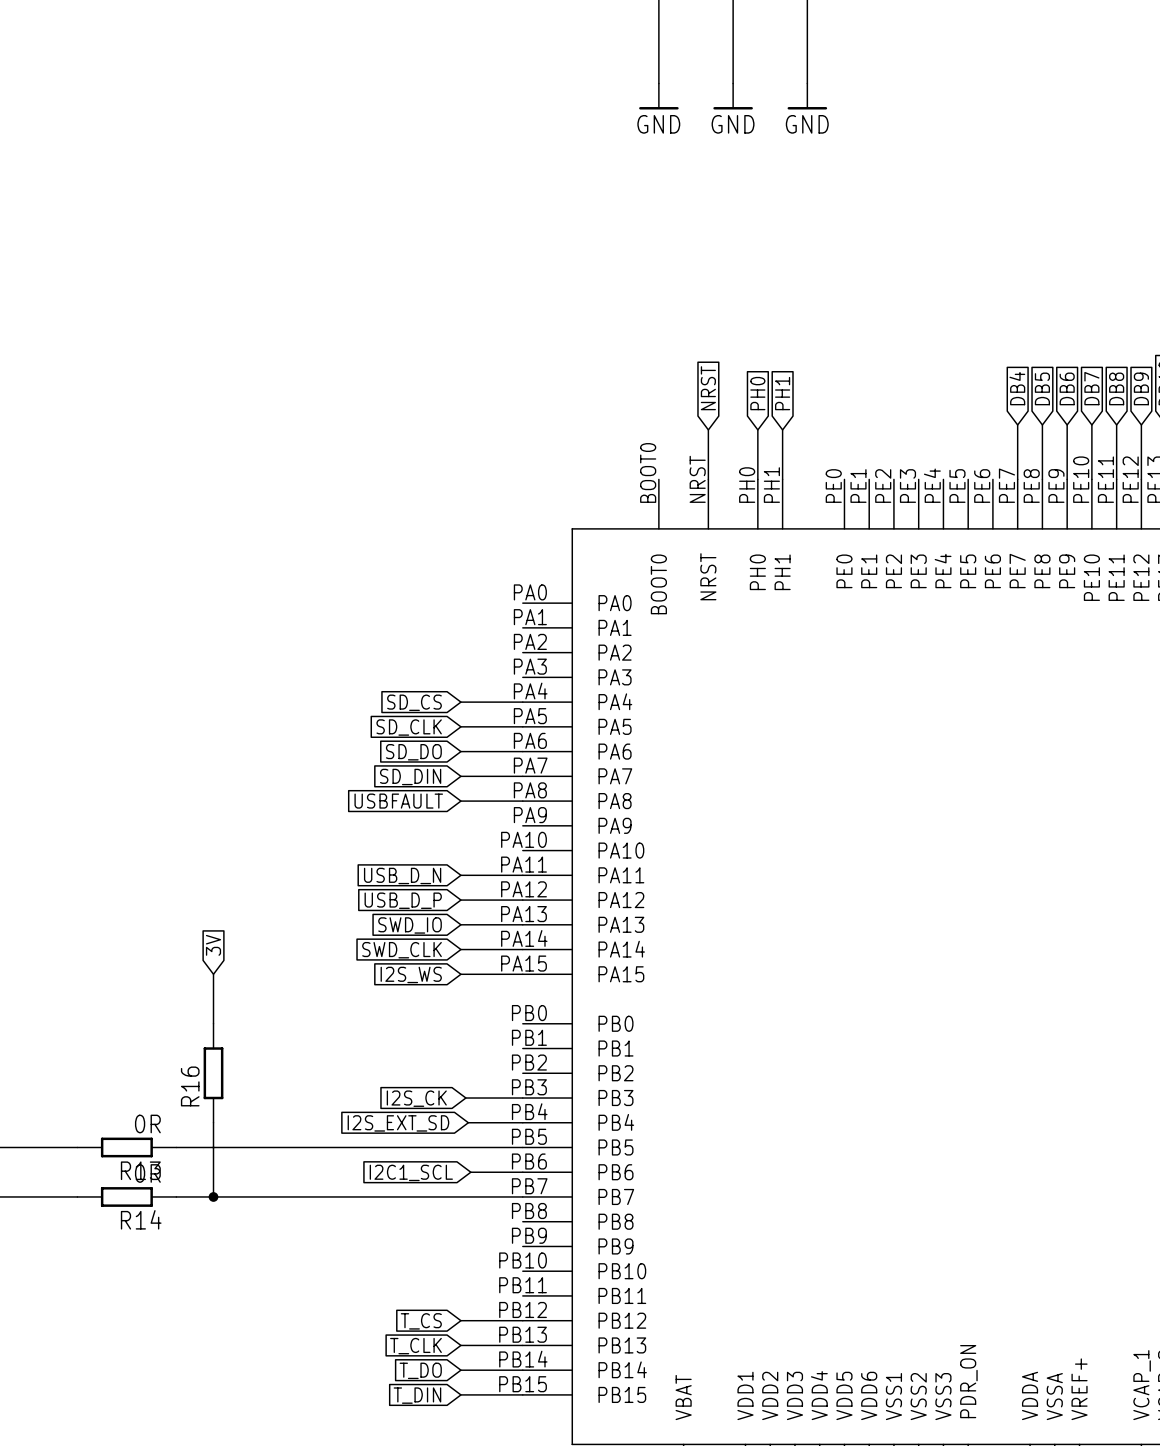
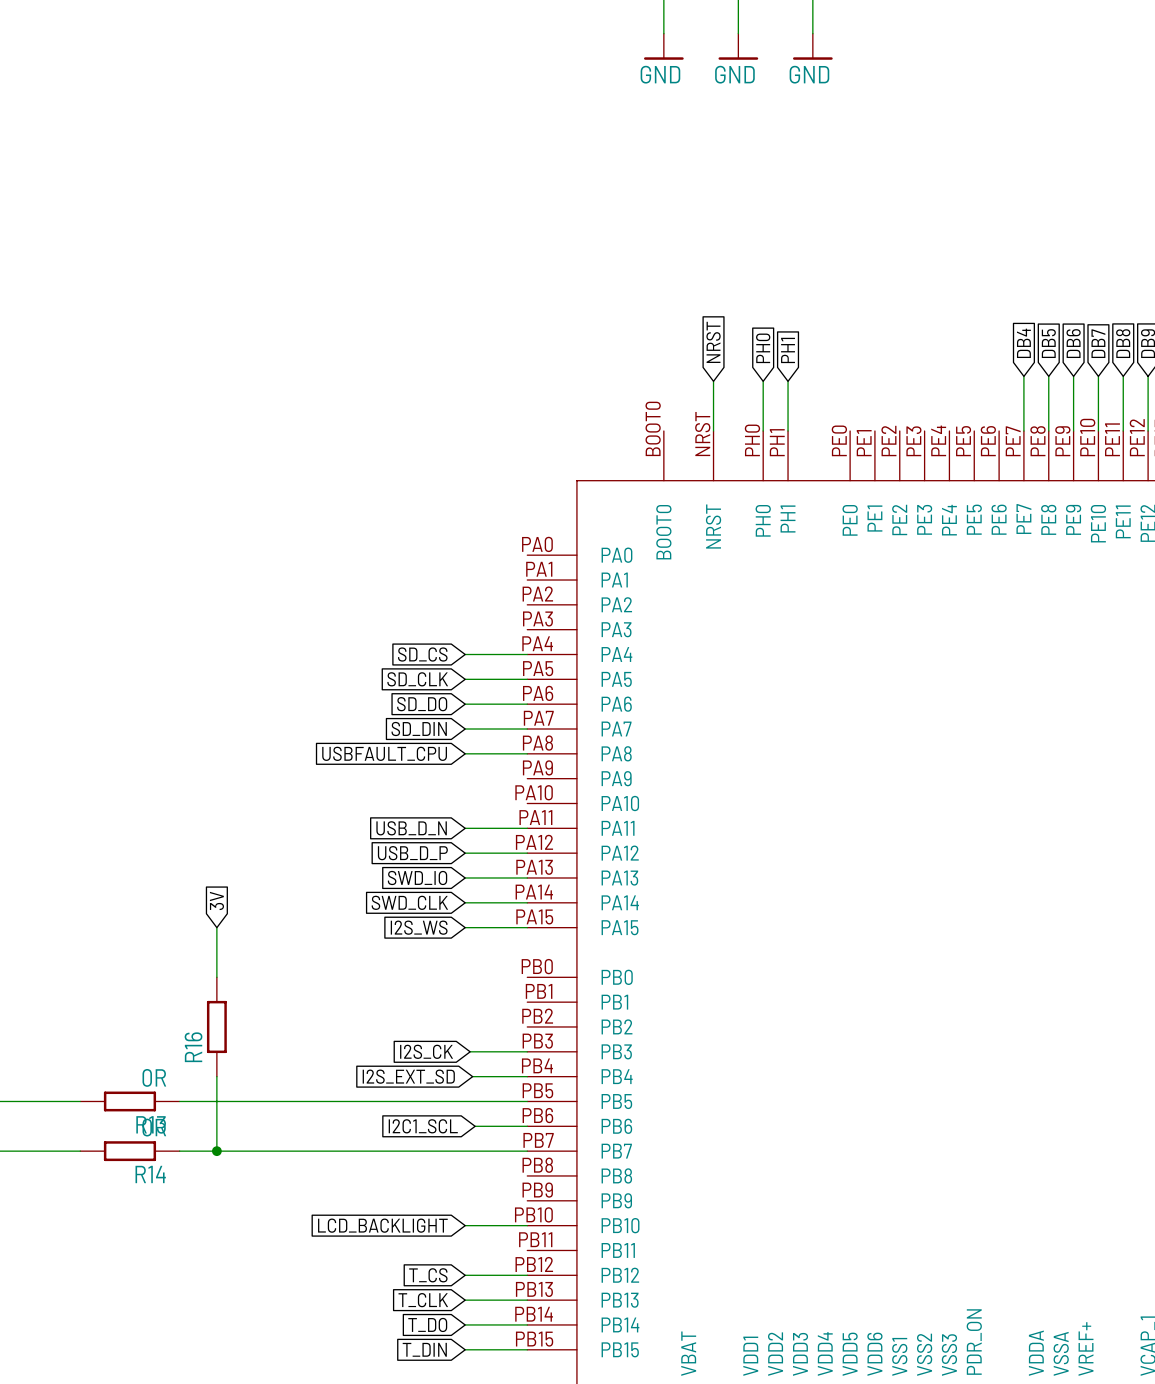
global label: USBFAULT (398, 801) -> USBFAULT_CPU (384, 753)
global label: none -> LCD_BACKLIGHT (382, 1225)
wire: none -> (465, 1225) (527, 1225)

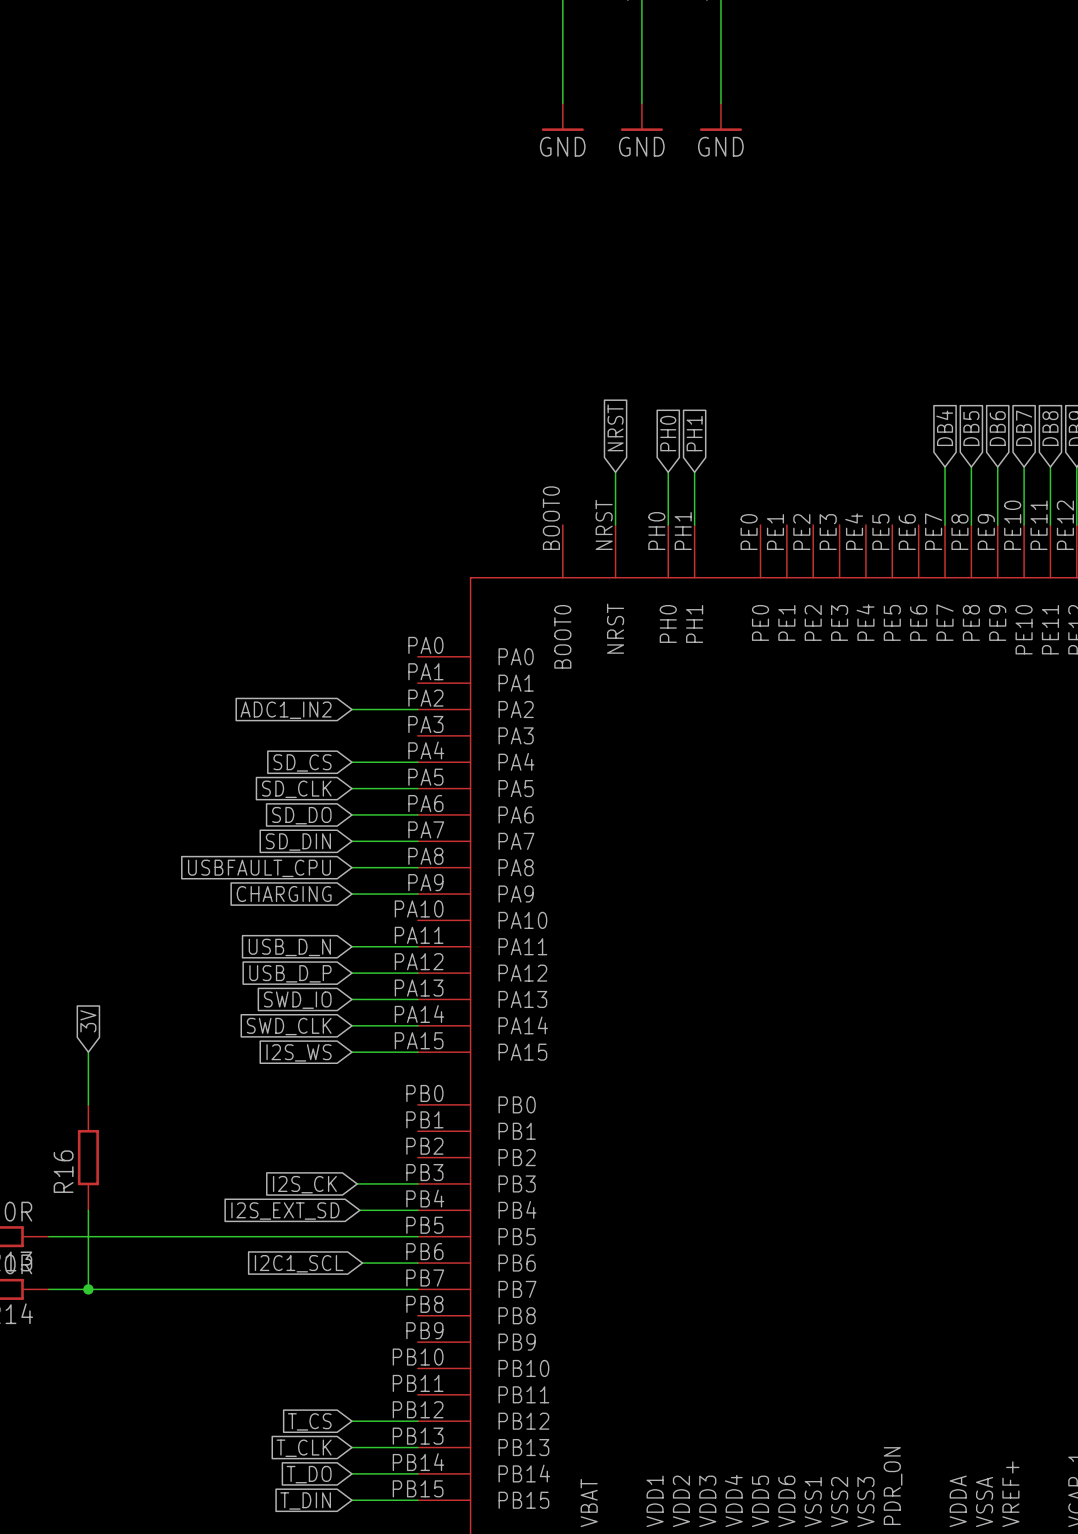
global label: none -> ADC1_IN2 (286, 710)
wire: none -> (351, 709) (417, 709)
global label: none -> CHARGING (284, 894)
wire: none -> (351, 894) (417, 894)
global label: LCD_BACKLIGHT (382, 1225) -> none
wire: (465, 1225) (527, 1225) -> none

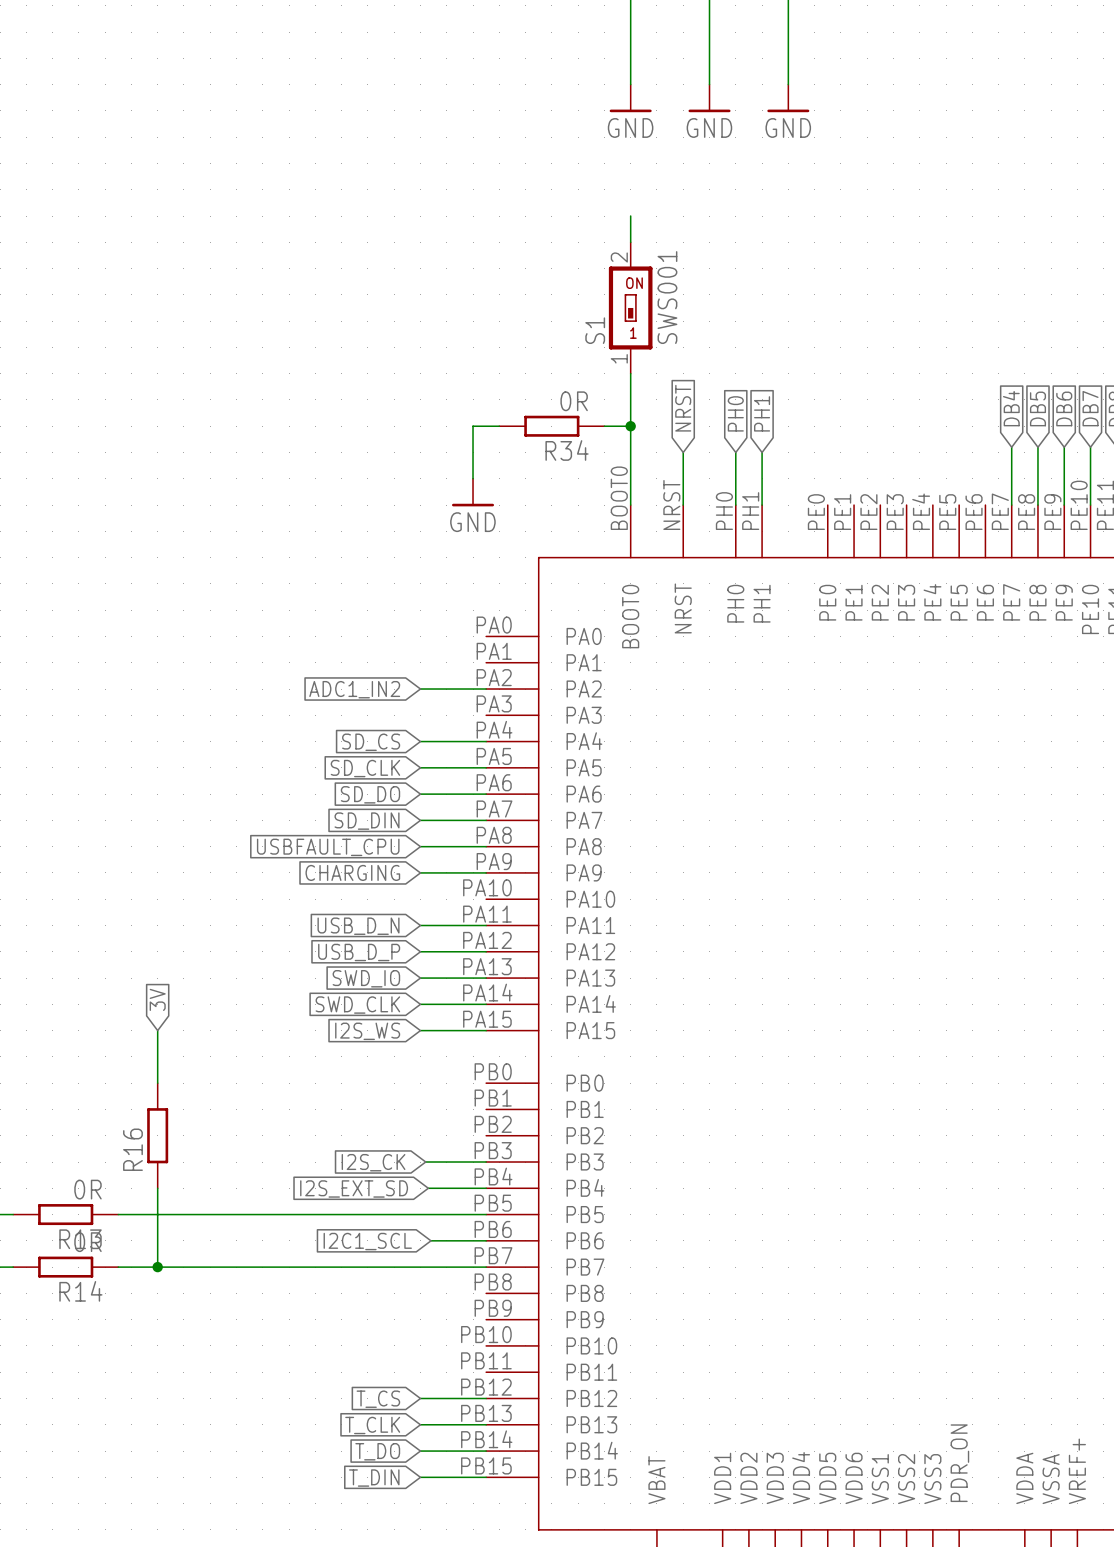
wire: none -> (630, 216) (630, 242)
S1: none -> SWS001 (630, 307)
wire: none -> (630, 373) (630, 505)
wire: none -> (499, 426) (473, 426) (473, 478)
R34: none -> 0R (551, 426)
wire: none -> (604, 426) (630, 426)
junction: none -> (630, 426)
power symbol: none -> GND (473, 492)

